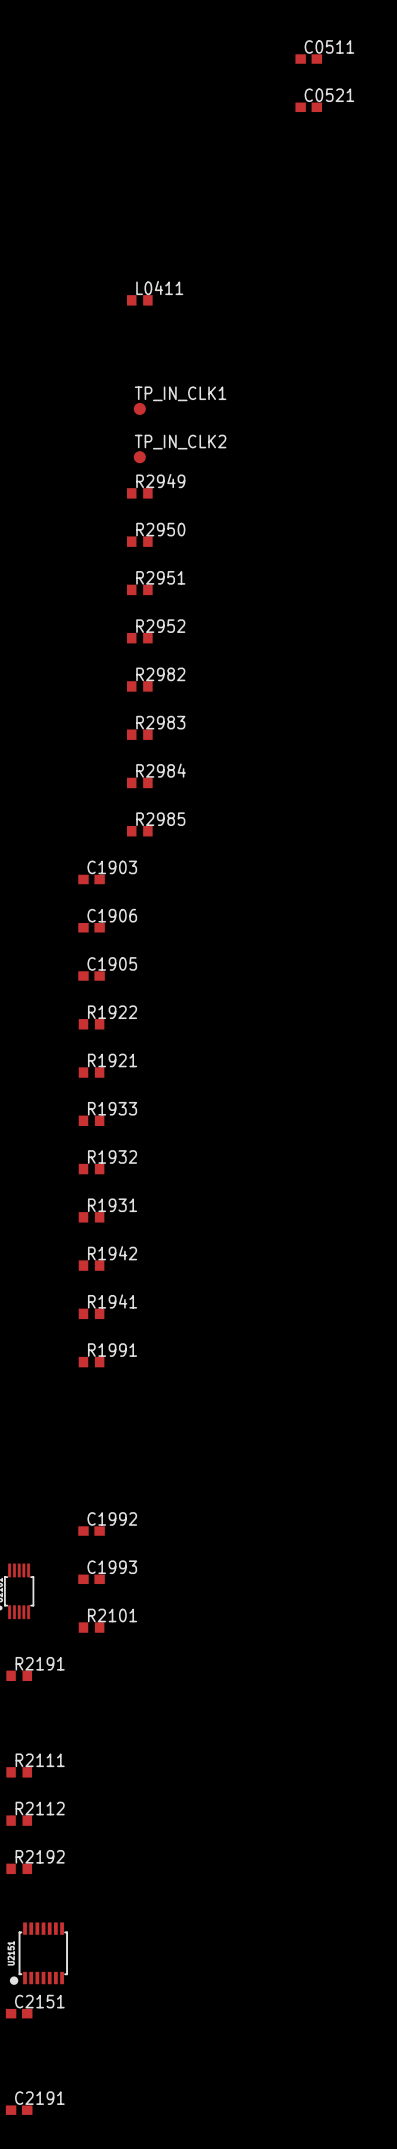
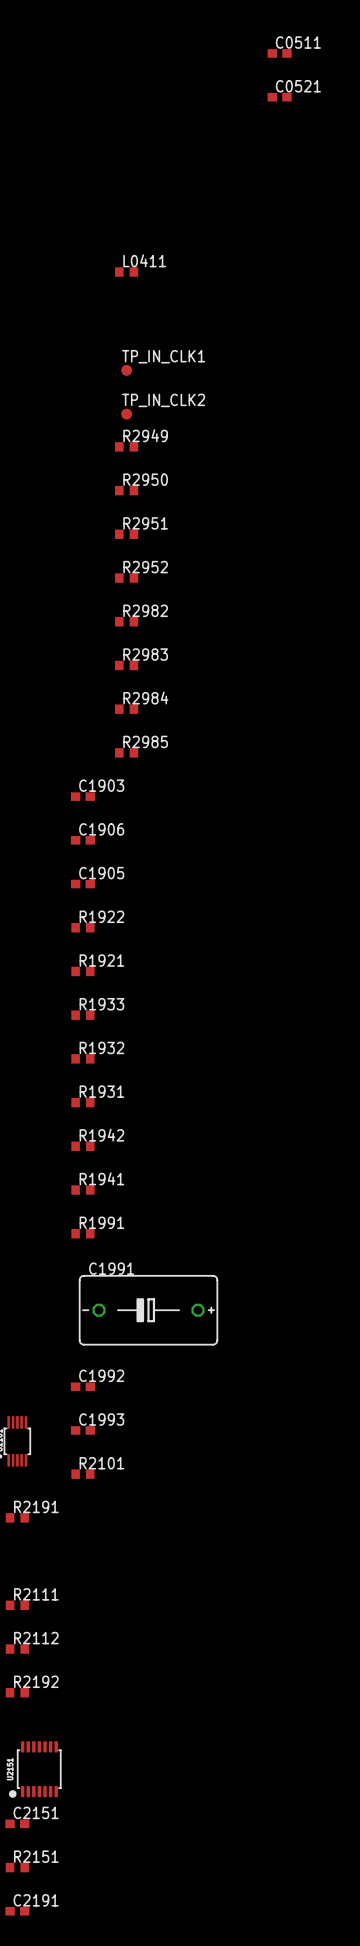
C1991: none -> (148, 1310)
R2151: none -> (17, 1867)

